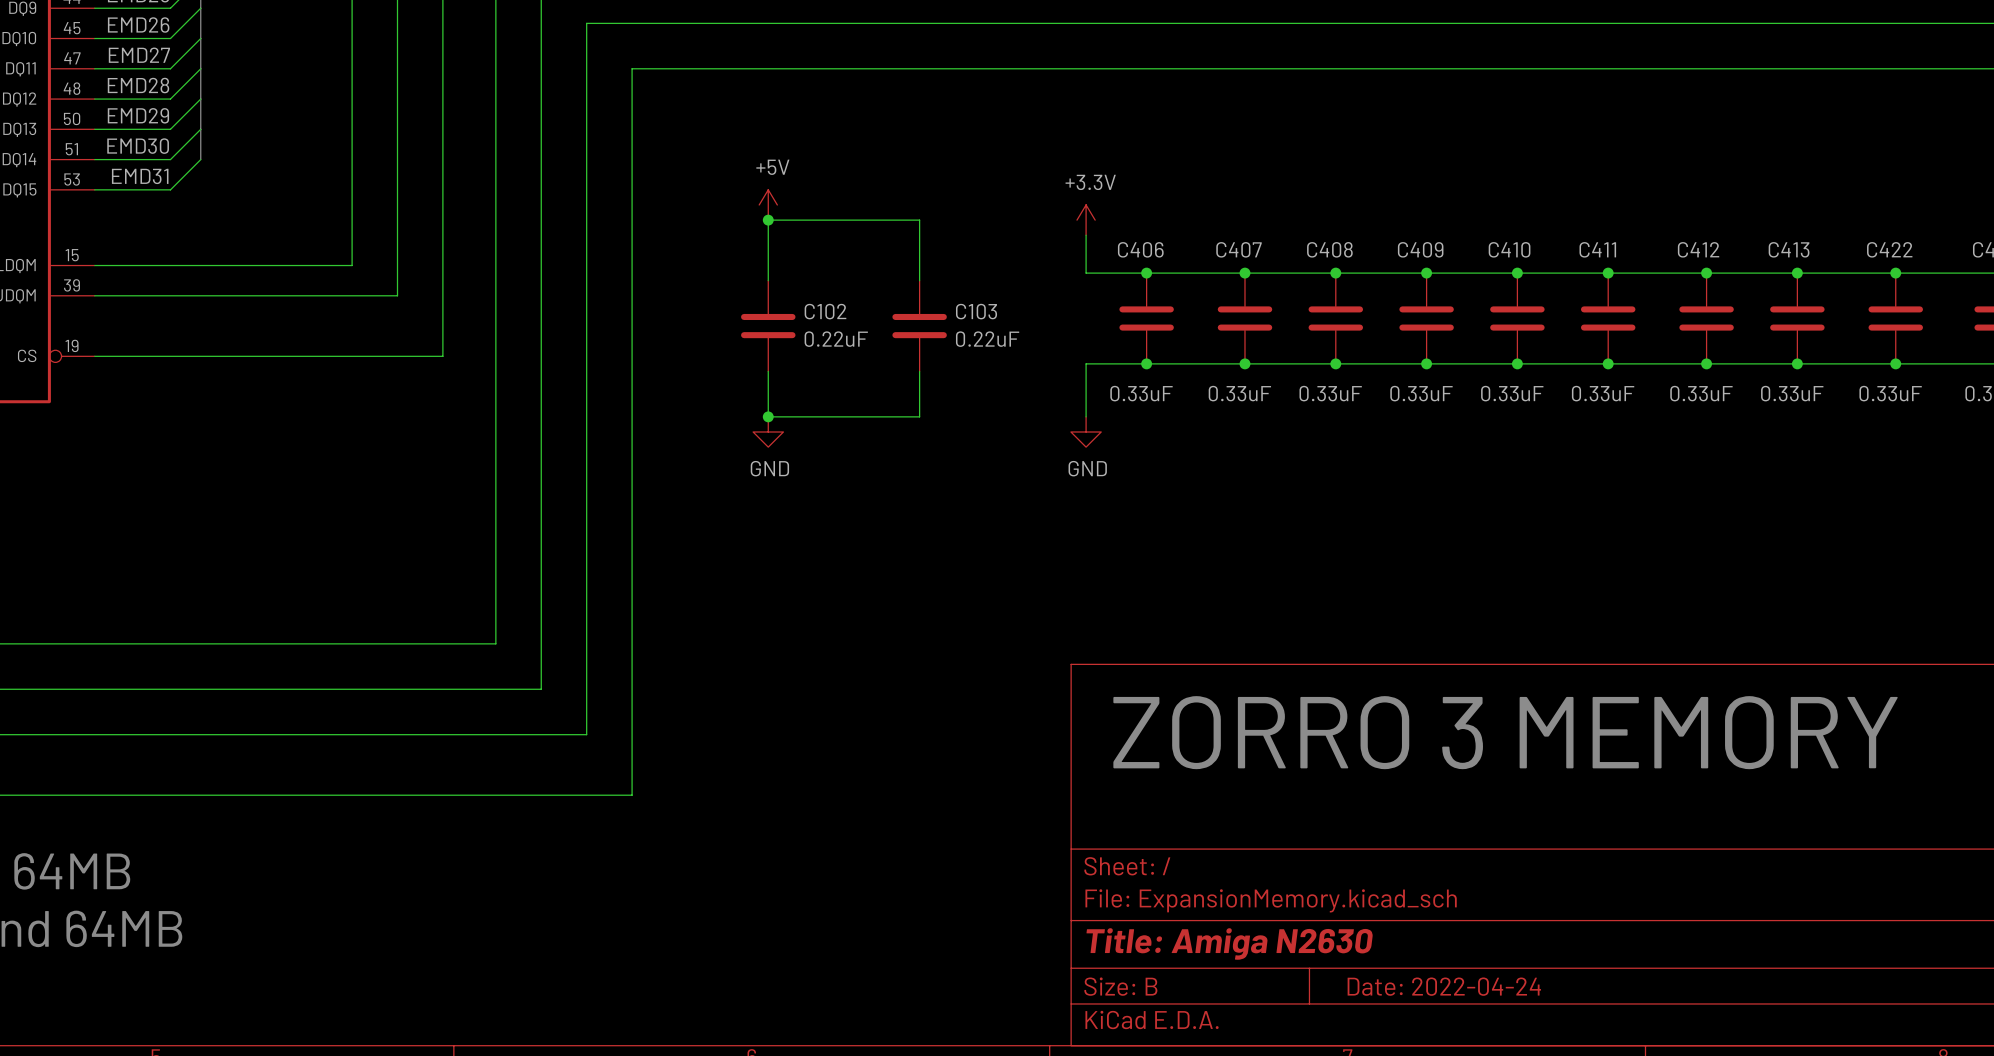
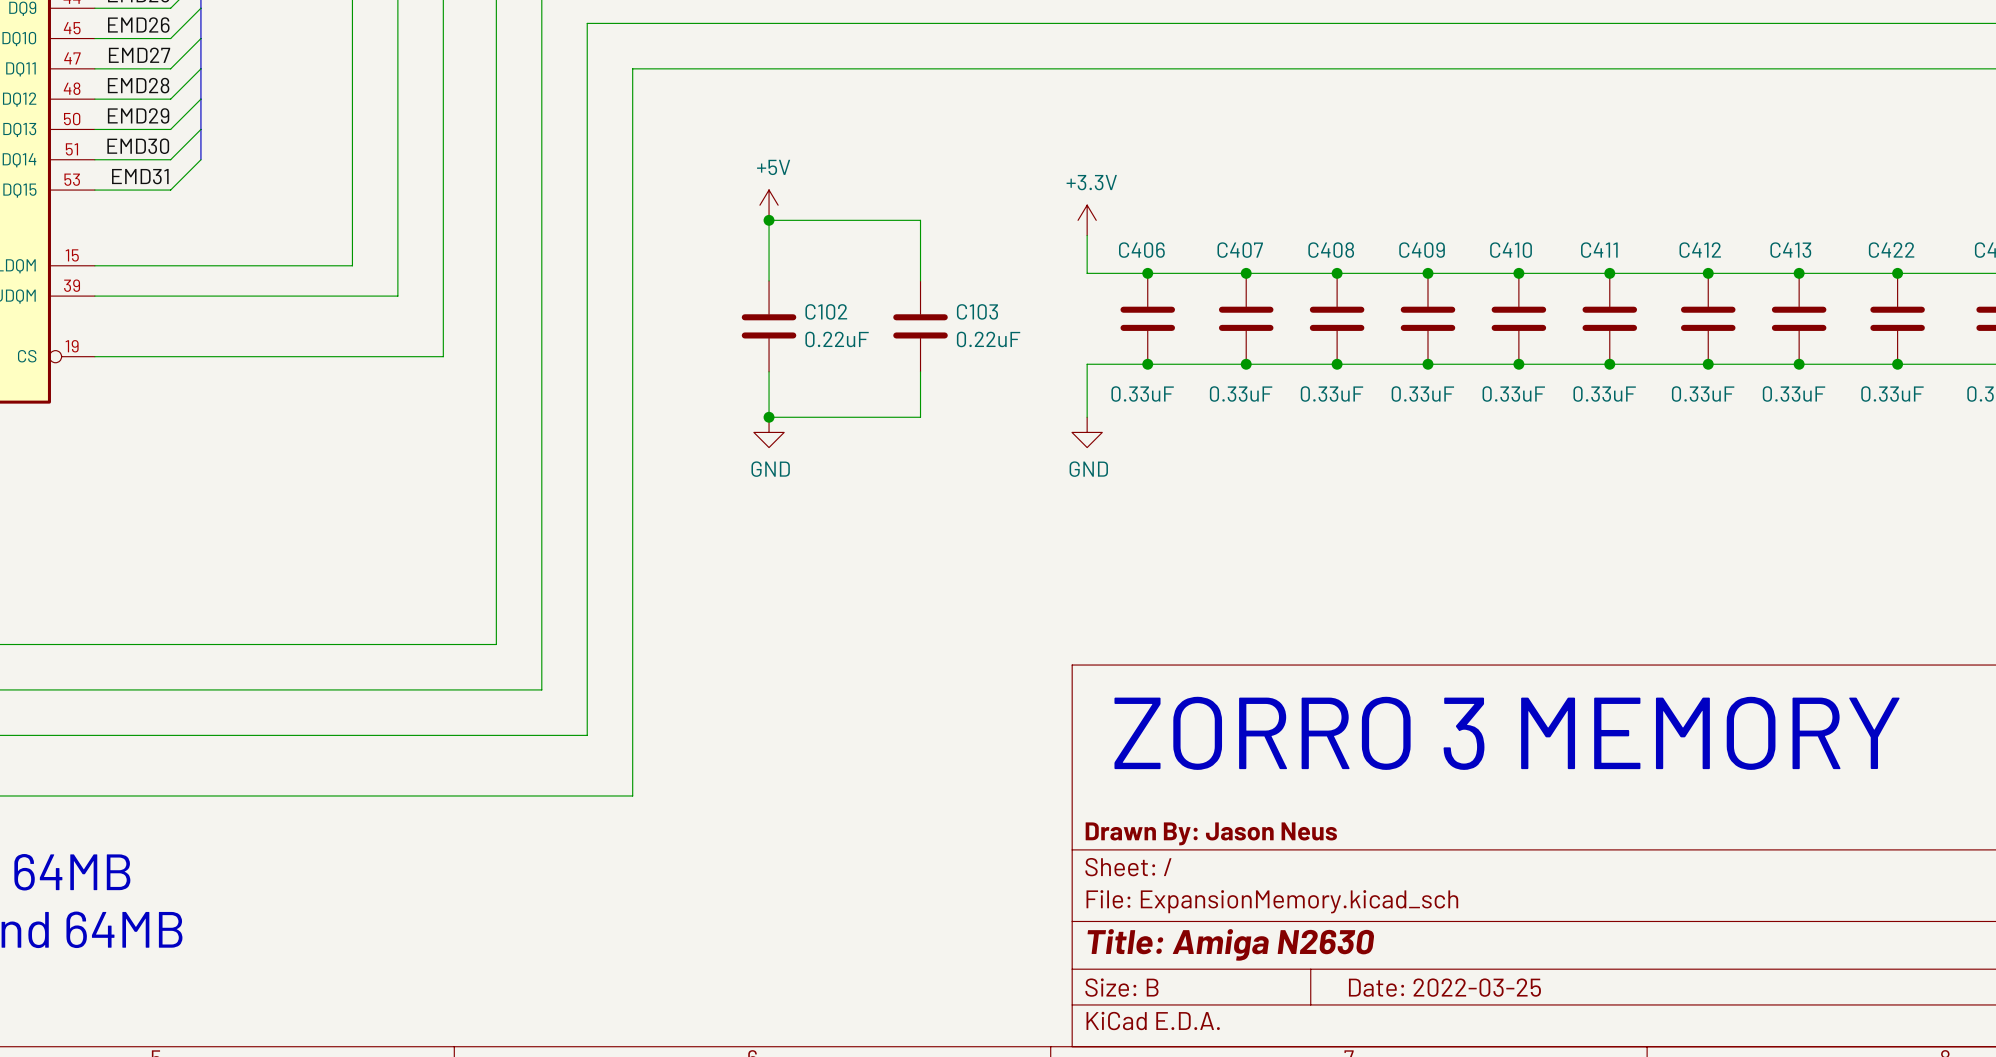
title block: none -> Drawn By: Jason Neus (1211, 833)
title block: Date: 2022-04-24 (1444, 986) -> Date: 2022-03-25 (1444, 987)

